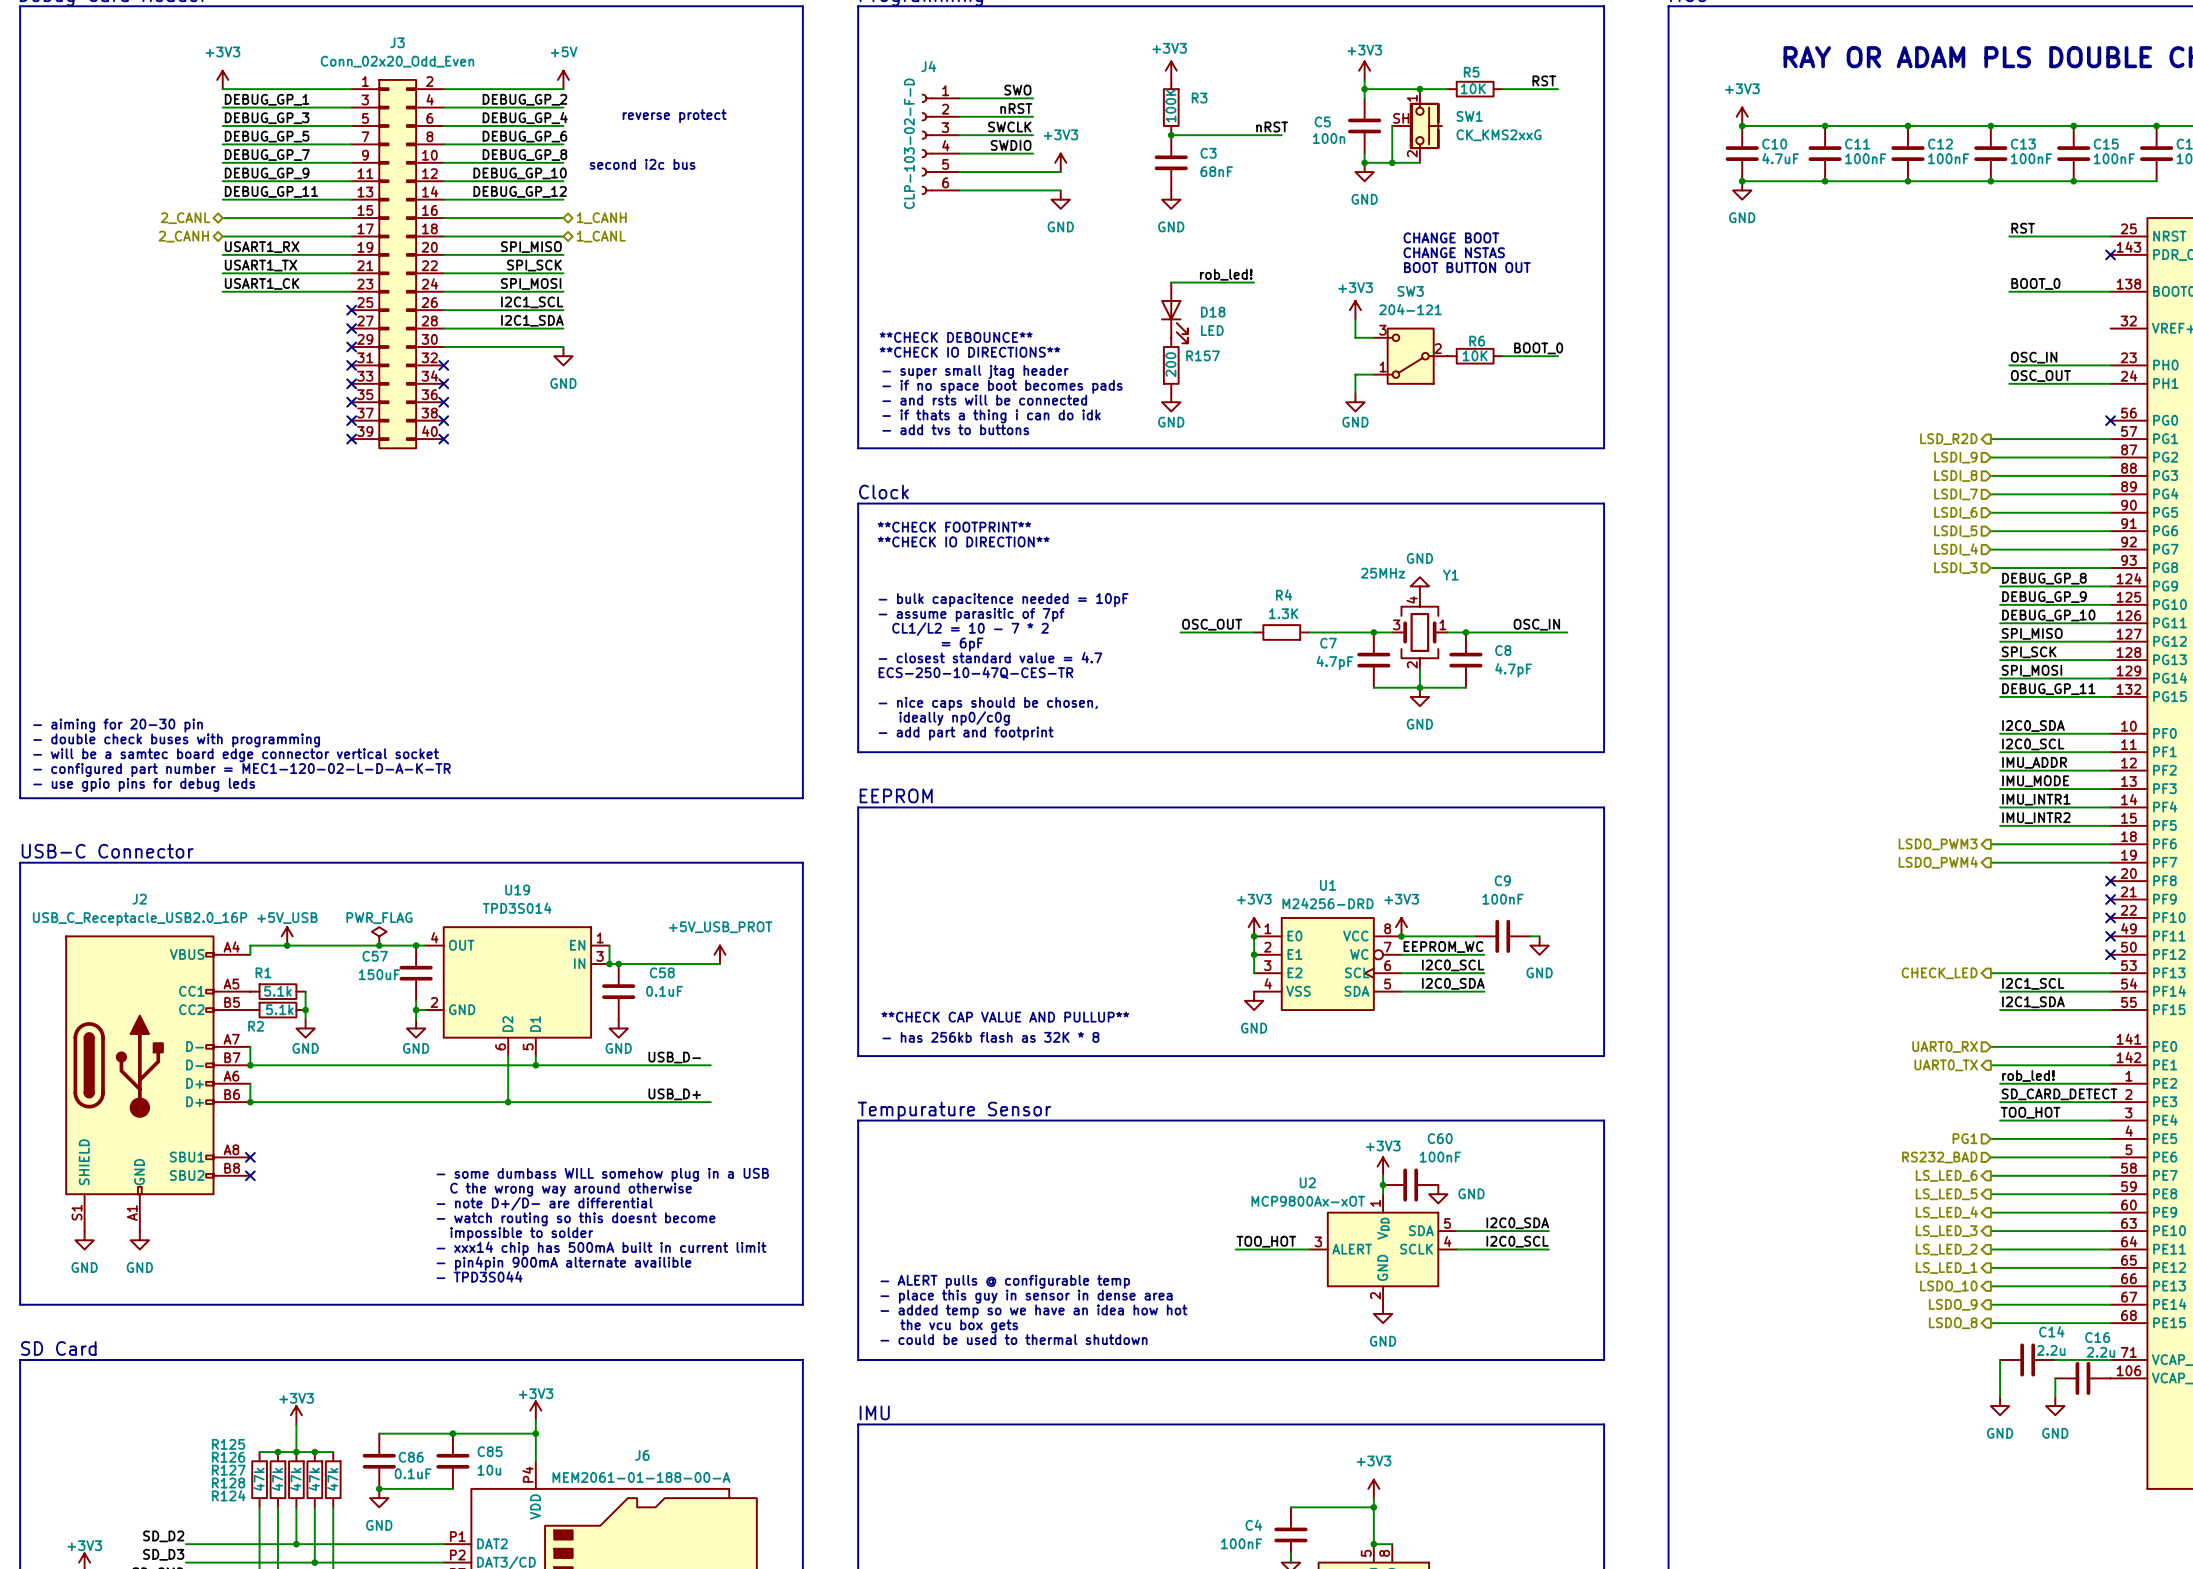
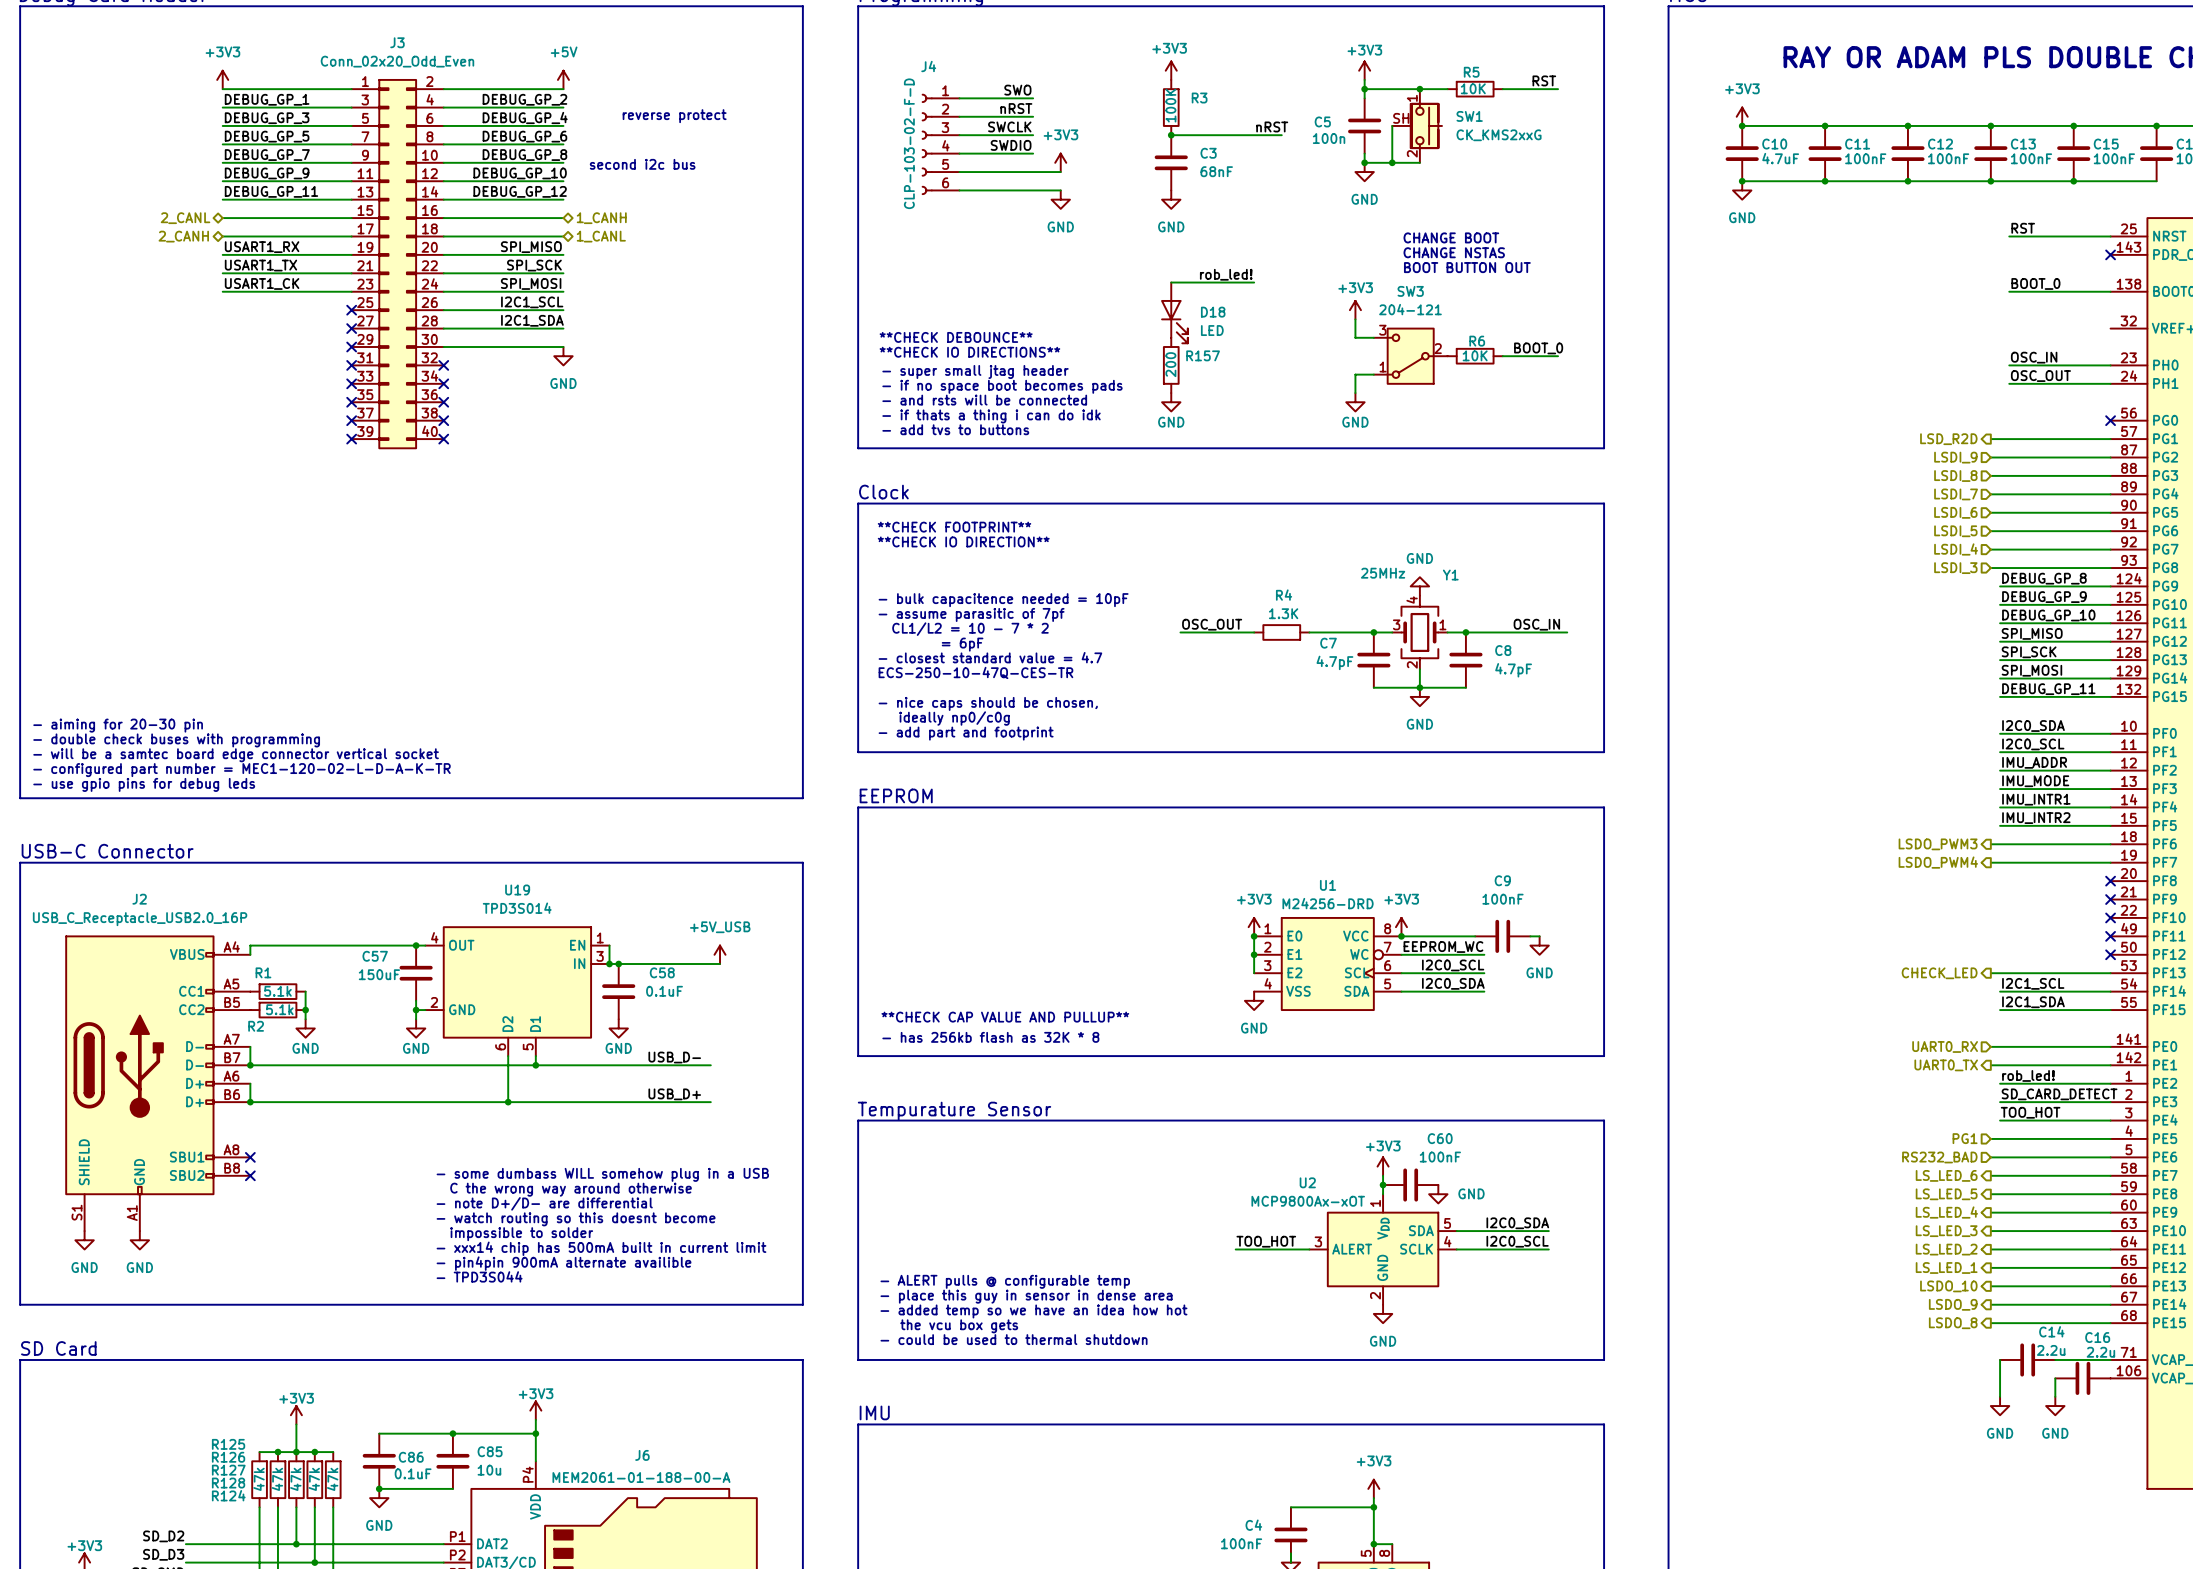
power symbol: +5V_USB (287, 936) -> none
power symbol: PWR_FLAG (379, 936) -> none
junction: (287, 945) -> none
junction: (379, 945) -> none
power symbol: +5V_USB_PROT (720, 954) -> +5V_USB (720, 954)

